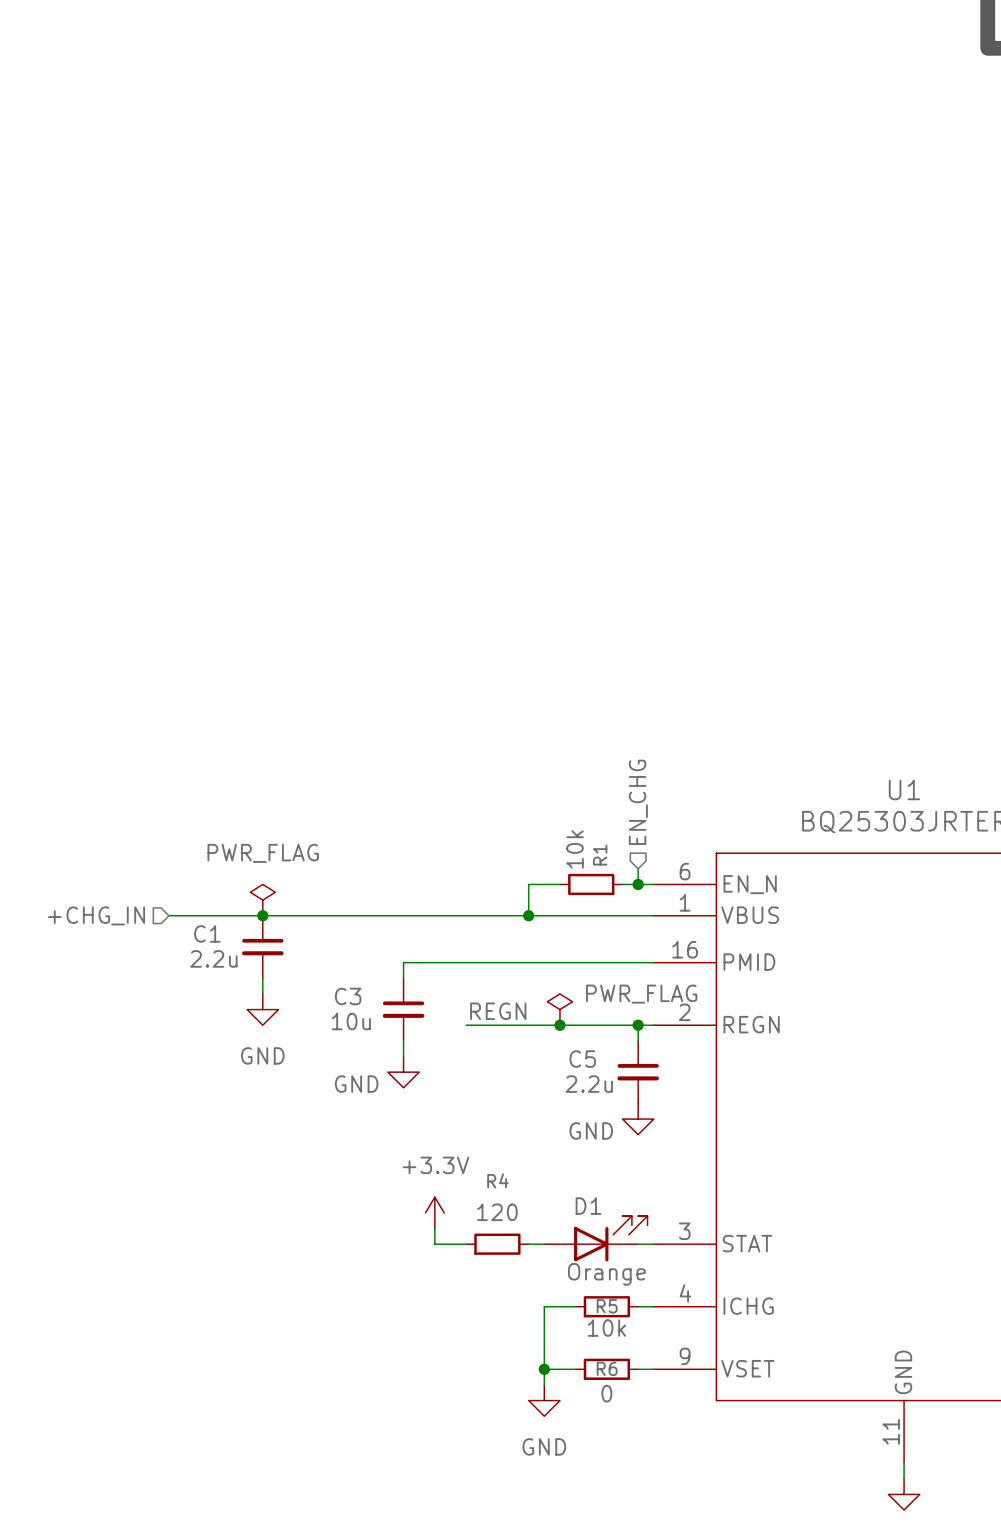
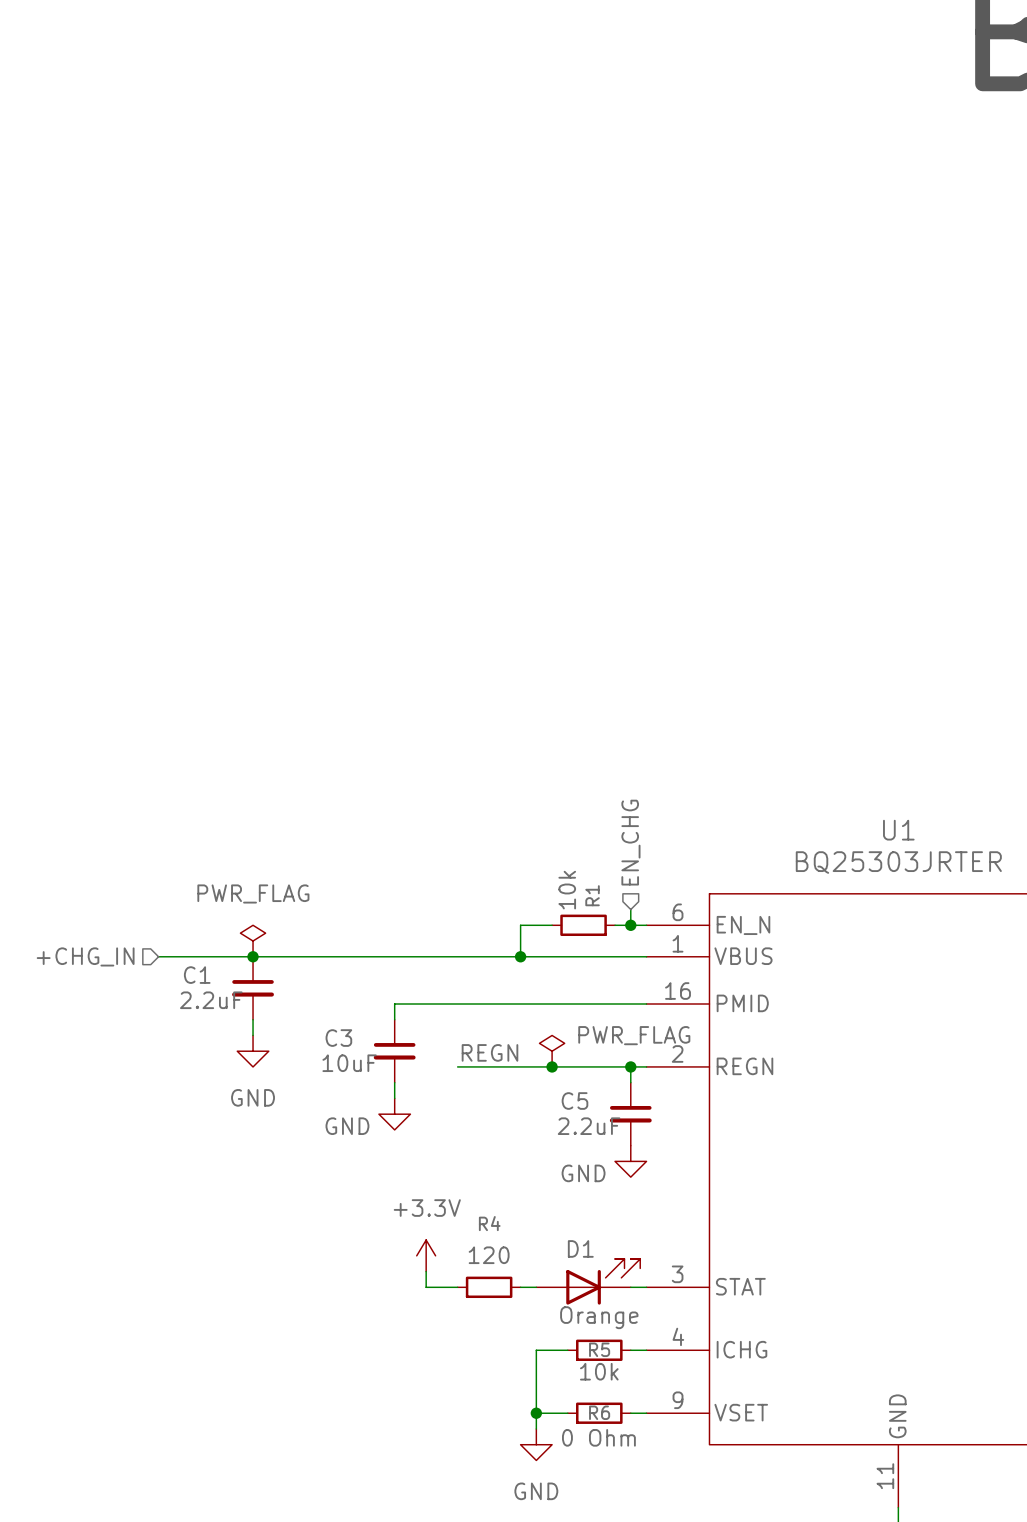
C1 value: 2.2u (213, 958) -> 2.2uF (211, 1000)
C3 value: 10u (351, 1021) -> 10uF (349, 1063)
C5 value: 2.2u (589, 1084) -> 2.2uF (589, 1126)
R6 value: 0 (606, 1393) -> 0 Ohm (598, 1437)

